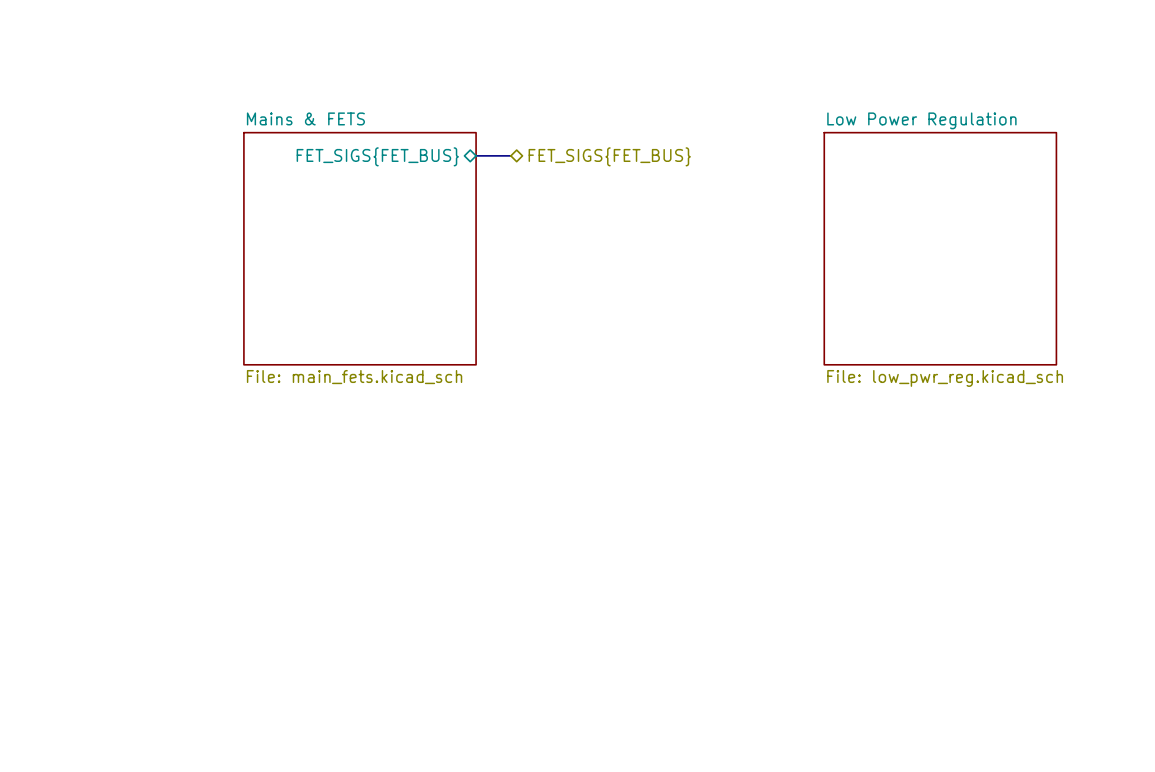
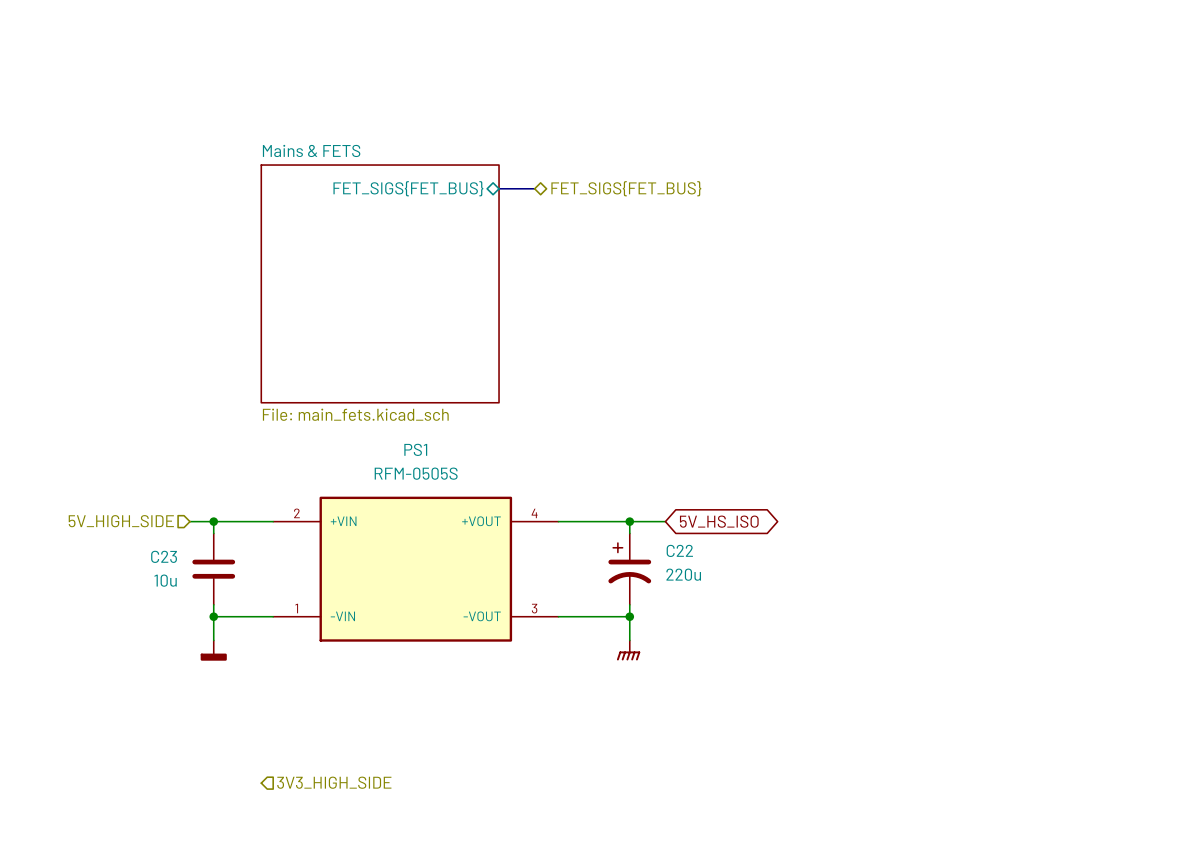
sheet Low Power Regulation: File: low_pwr_reg.kicad_sch (940, 248) -> none
hierarchical label: none -> 5V_HIGH_SIDE (121, 521)
wire: none -> (189, 521) (273, 521)
wire: none -> (213, 521) (213, 533)
junction: none -> (213, 521)
wire: none -> (558, 521) (665, 521)
wire: none -> (629, 521) (629, 533)
junction: none -> (629, 521)
global label: none -> 5V_HS_ISO (719, 521)
C23: none -> 10u (213, 569)
PS1: none -> RFM-0505S (415, 569)
C22: none -> 220u (629, 569)
wire: none -> (213, 604) (213, 640)
wire: none -> (629, 604) (629, 640)
wire: none -> (213, 616) (273, 616)
junction: none -> (213, 616)
wire: none -> (558, 616) (629, 616)
junction: none -> (629, 616)
power symbol: none -> (213, 650)
power symbol: none -> (628, 650)
hierarchical label: none -> 3V3_HIGH_SIDE (334, 782)

